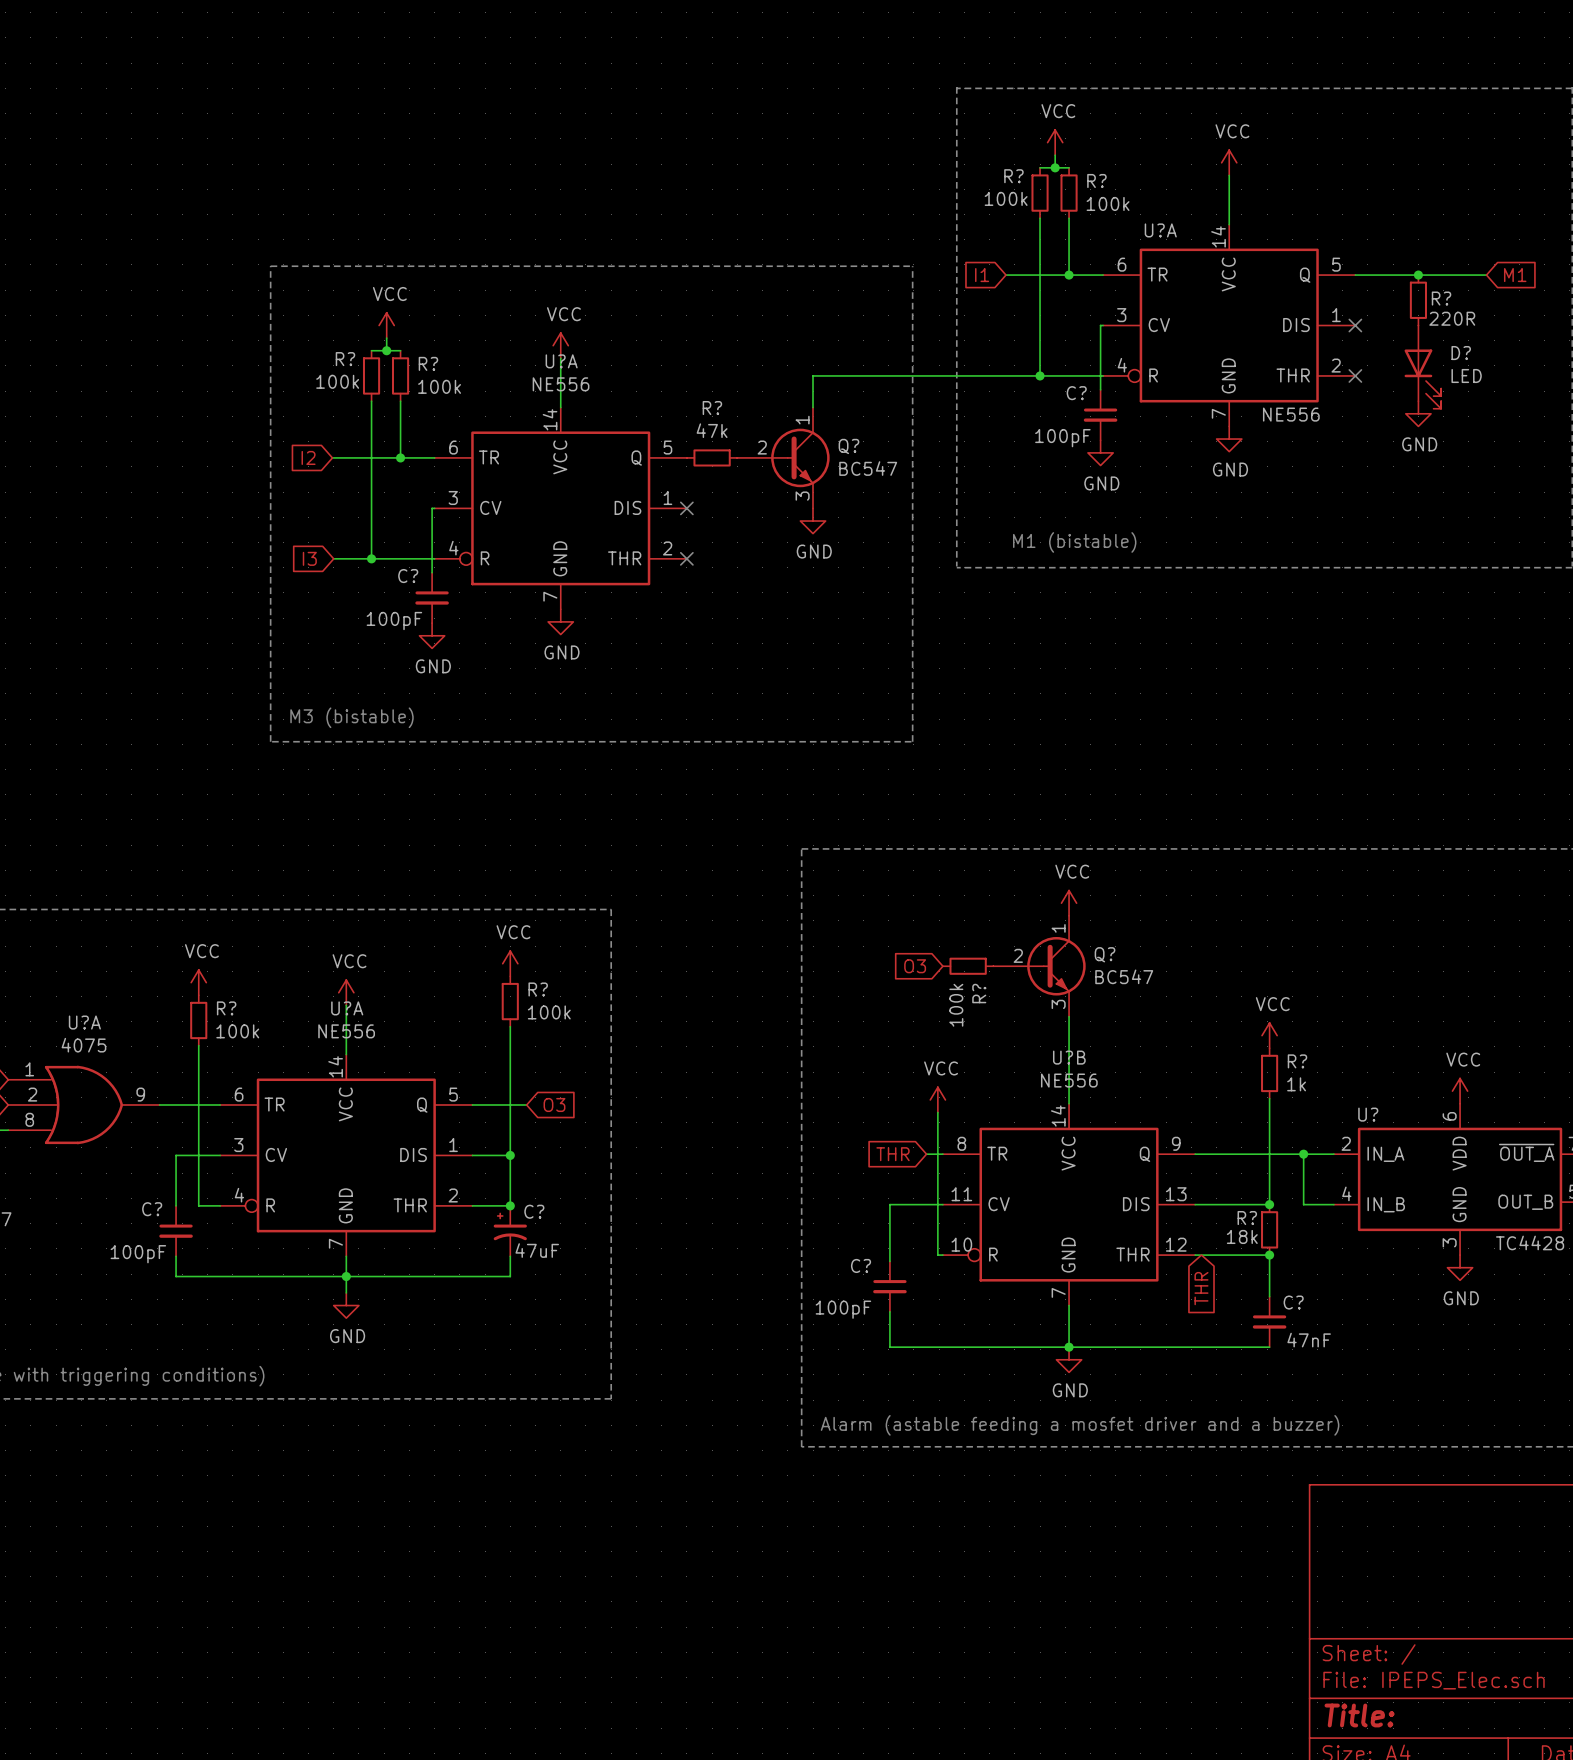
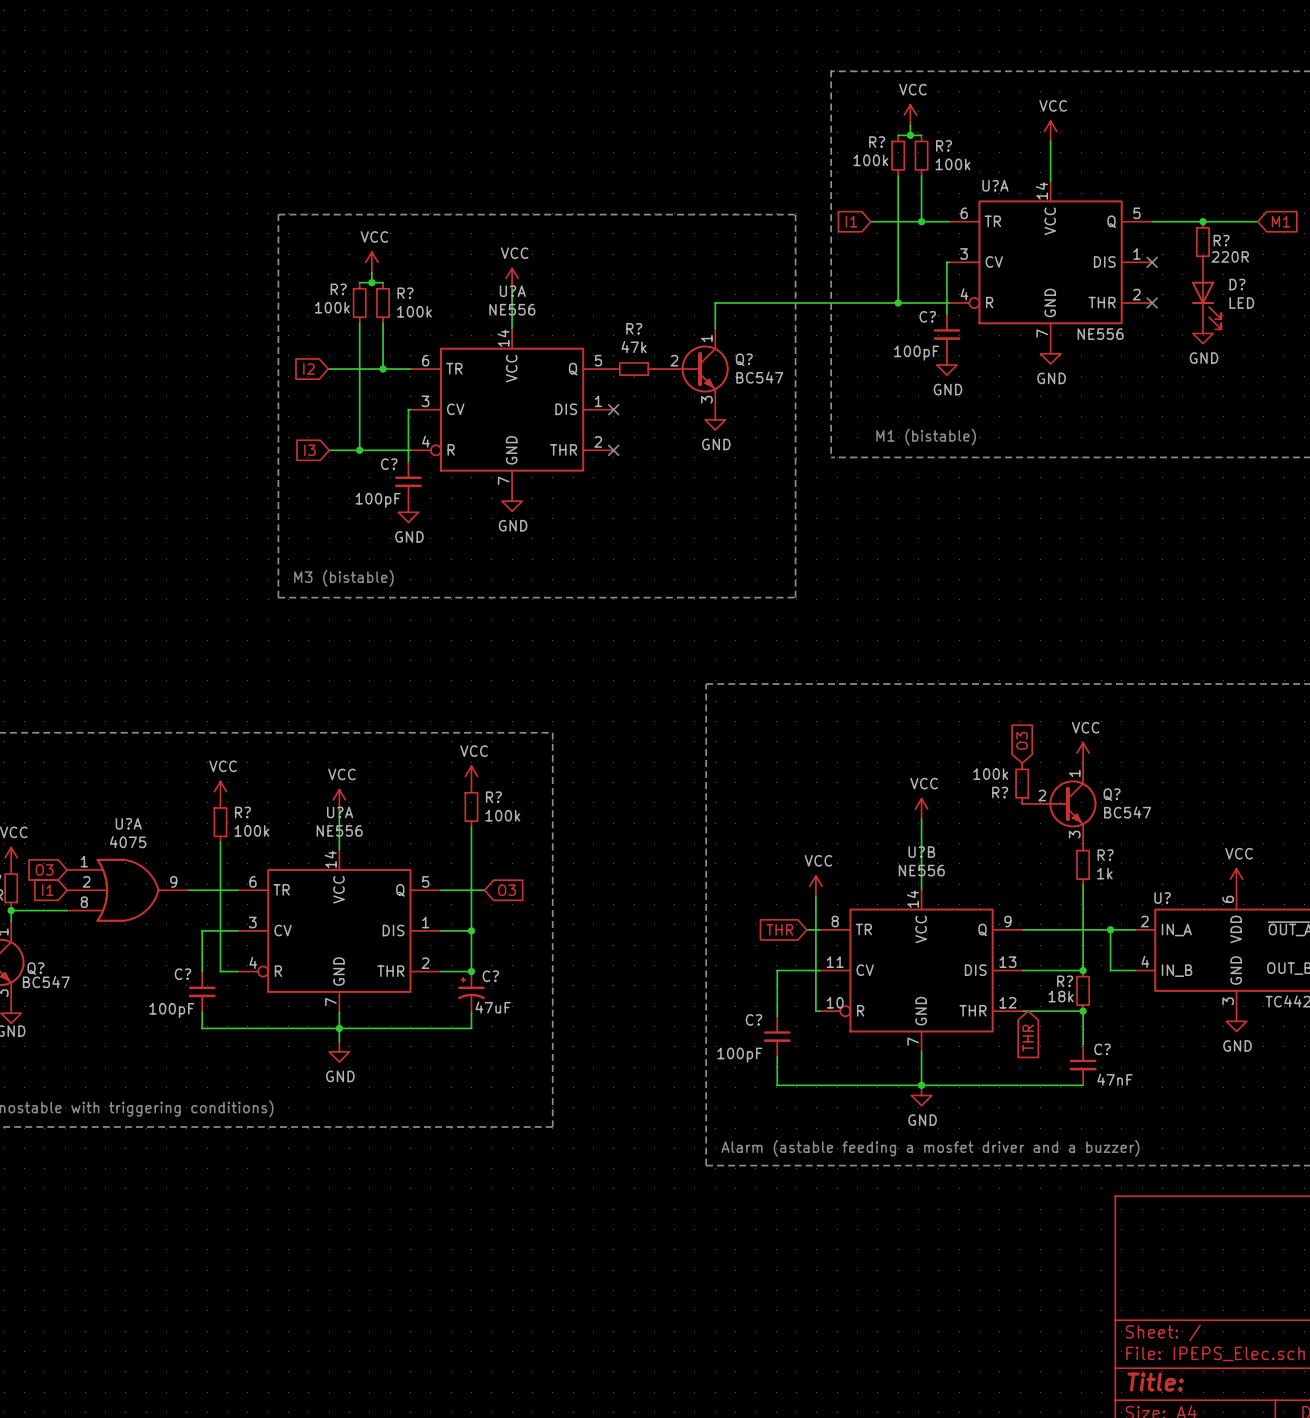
power symbol position: VCC (1069, 903) -> VCC (921, 808)
global label: none -> O3 (1022, 740)
global label: O3 (915, 966) -> none
R? rotation: 0° (968, 966) -> 90° clockwise (1022, 783)
R? position: (968, 966) -> (1022, 783)
Q? position: (1039, 966) -> (1059, 803)
power symbol position: VCC (1269, 1035) -> VCC (1083, 753)

